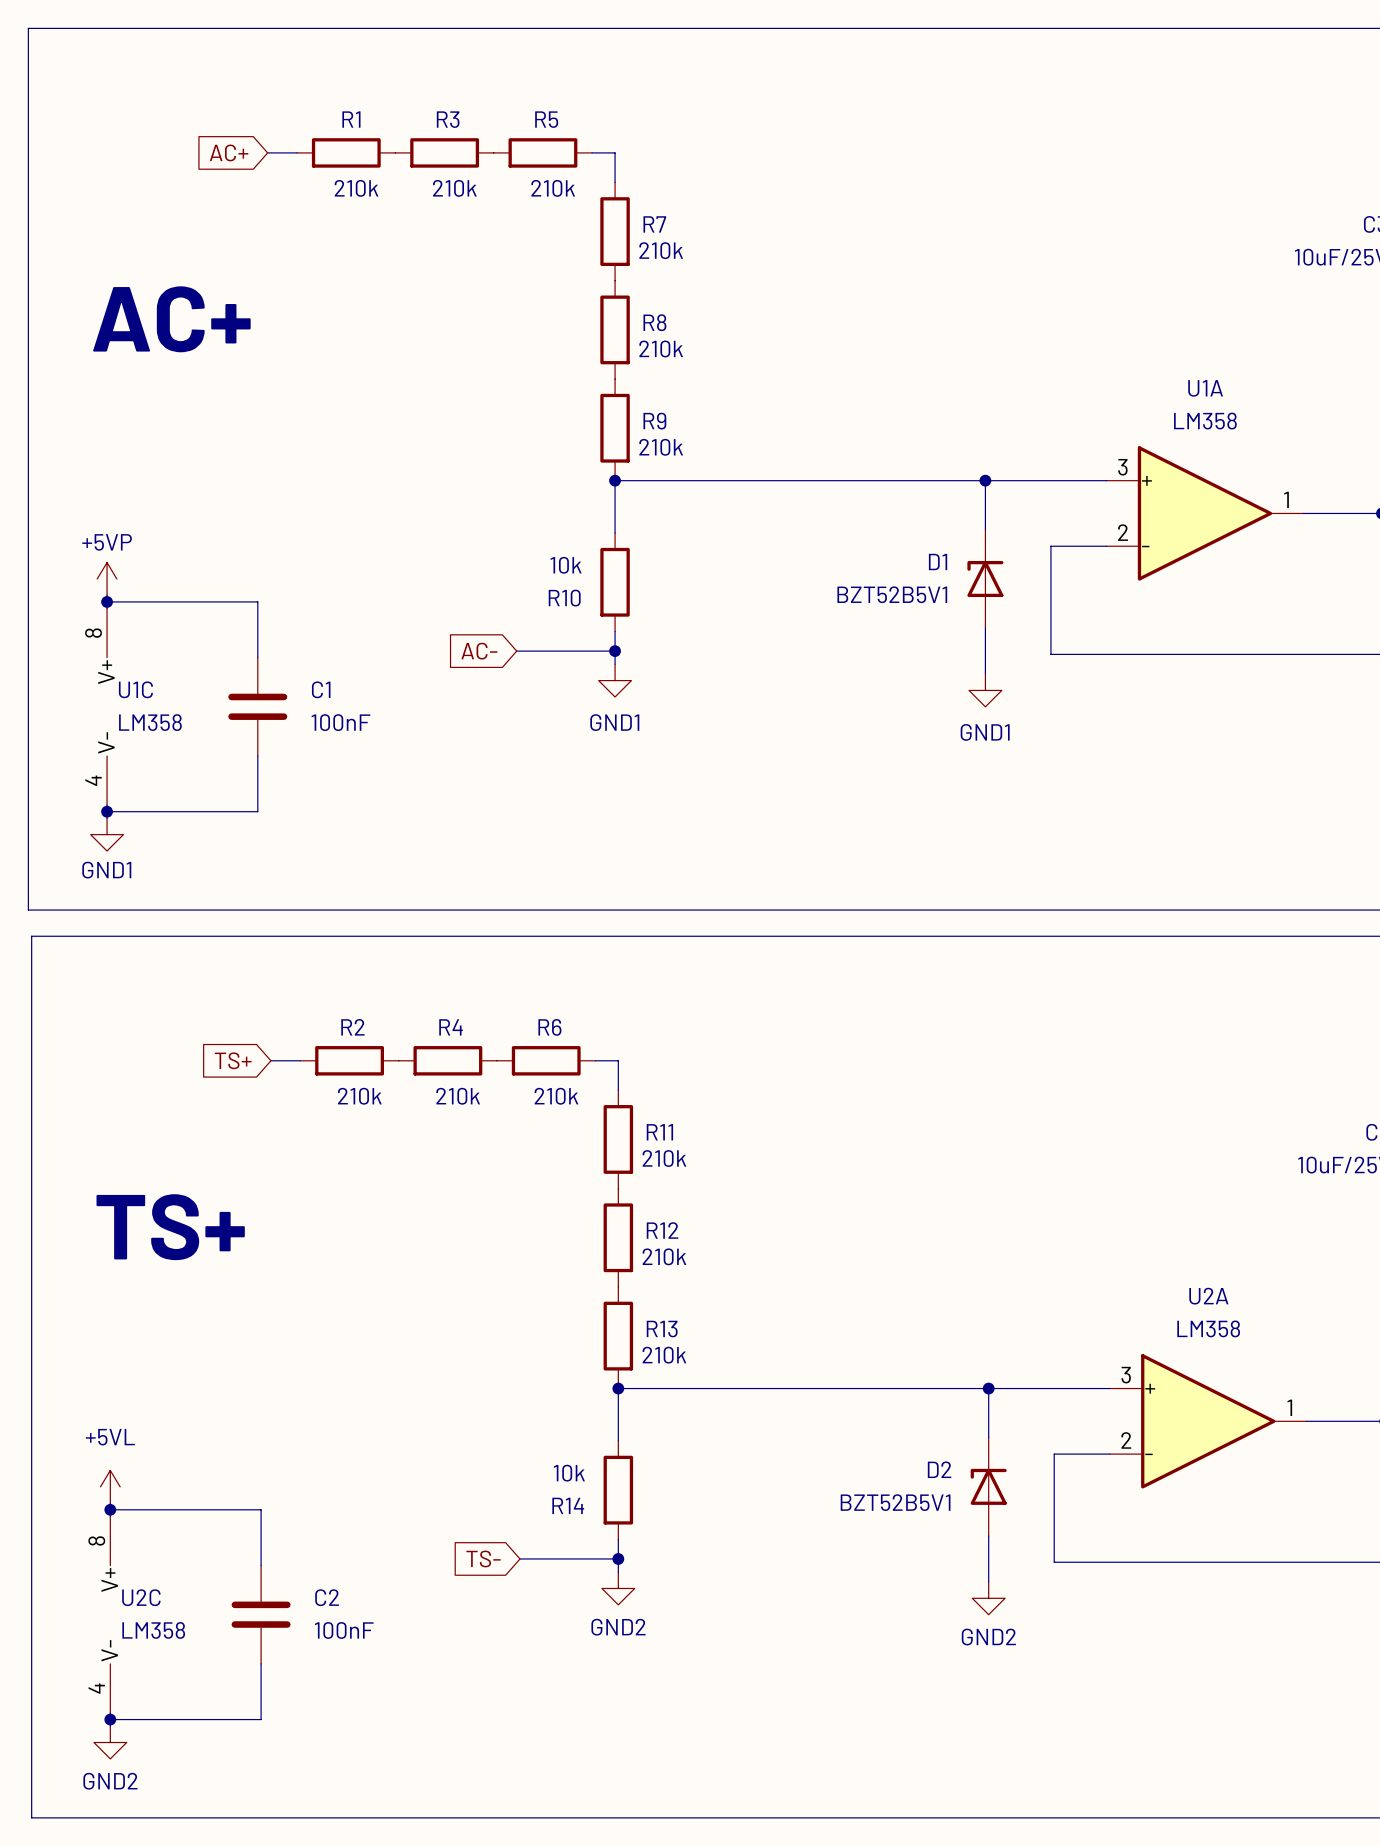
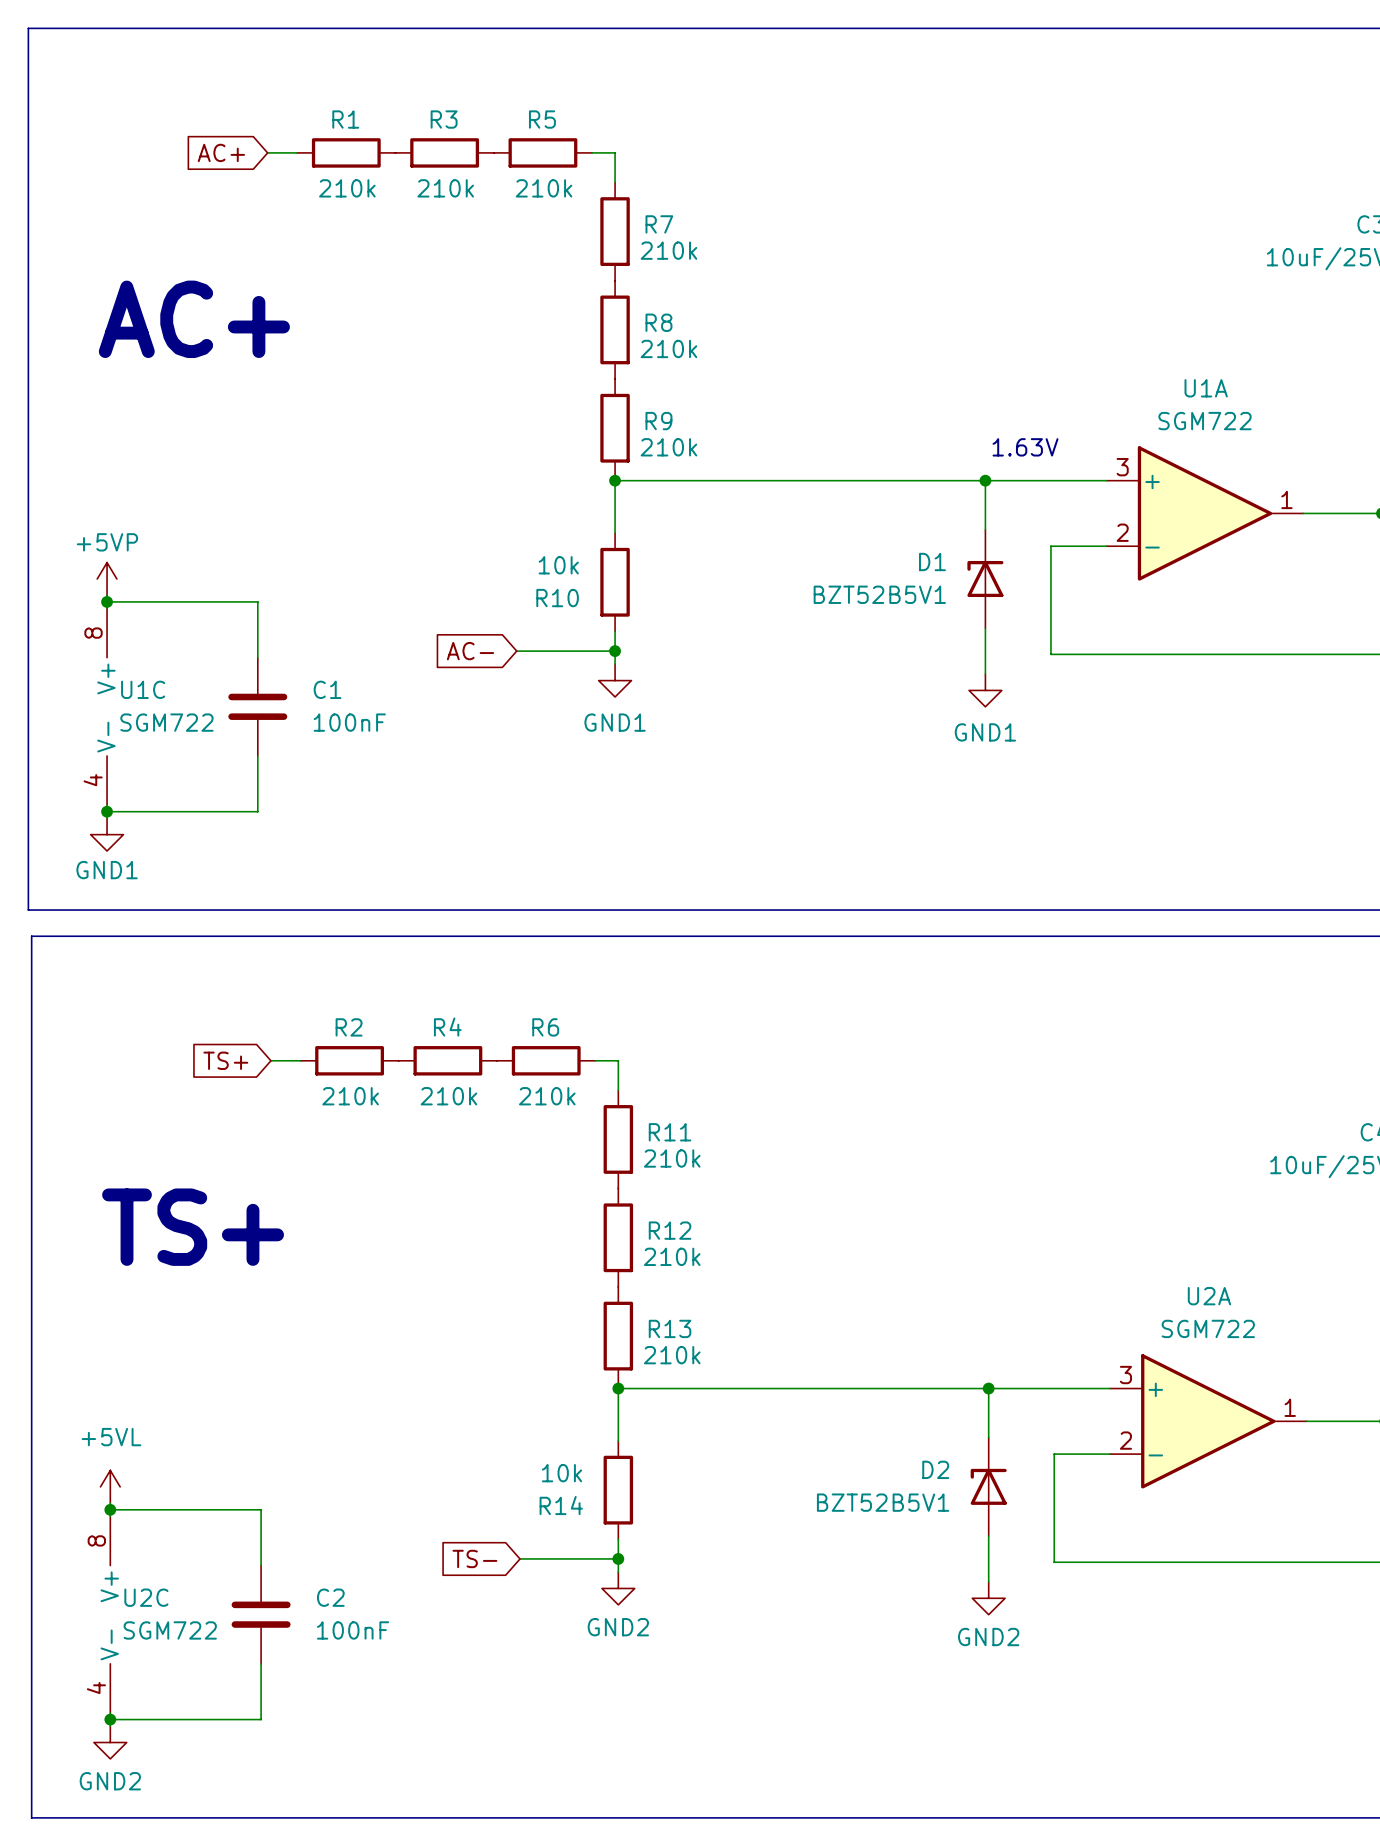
U1A value: LM358 (1205, 421) -> SGM722 (1205, 421)
text: none -> 1.63V (1025, 447)
U1C value: LM358 (150, 722) -> SGM722 (166, 722)
U2A value: LM358 (1208, 1328) -> SGM722 (1208, 1328)
U2C value: LM358 (153, 1630) -> SGM722 (170, 1630)

